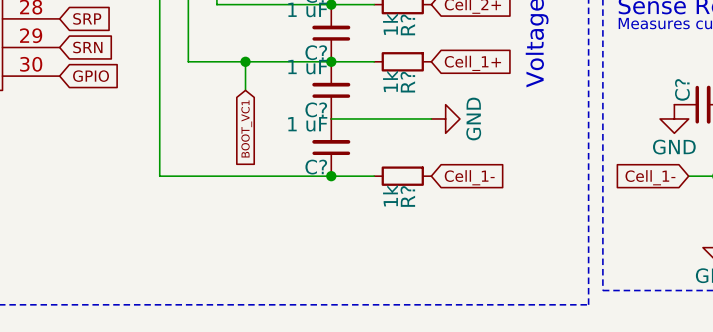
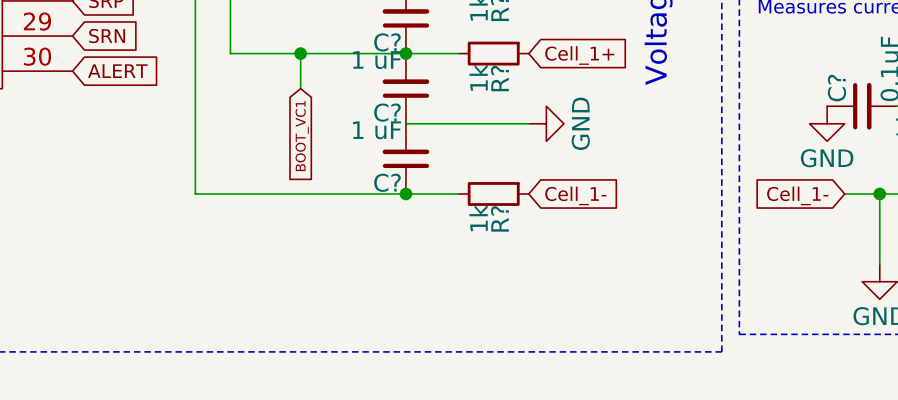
global label: GPIO (91, 76) -> ALERT (117, 71)

